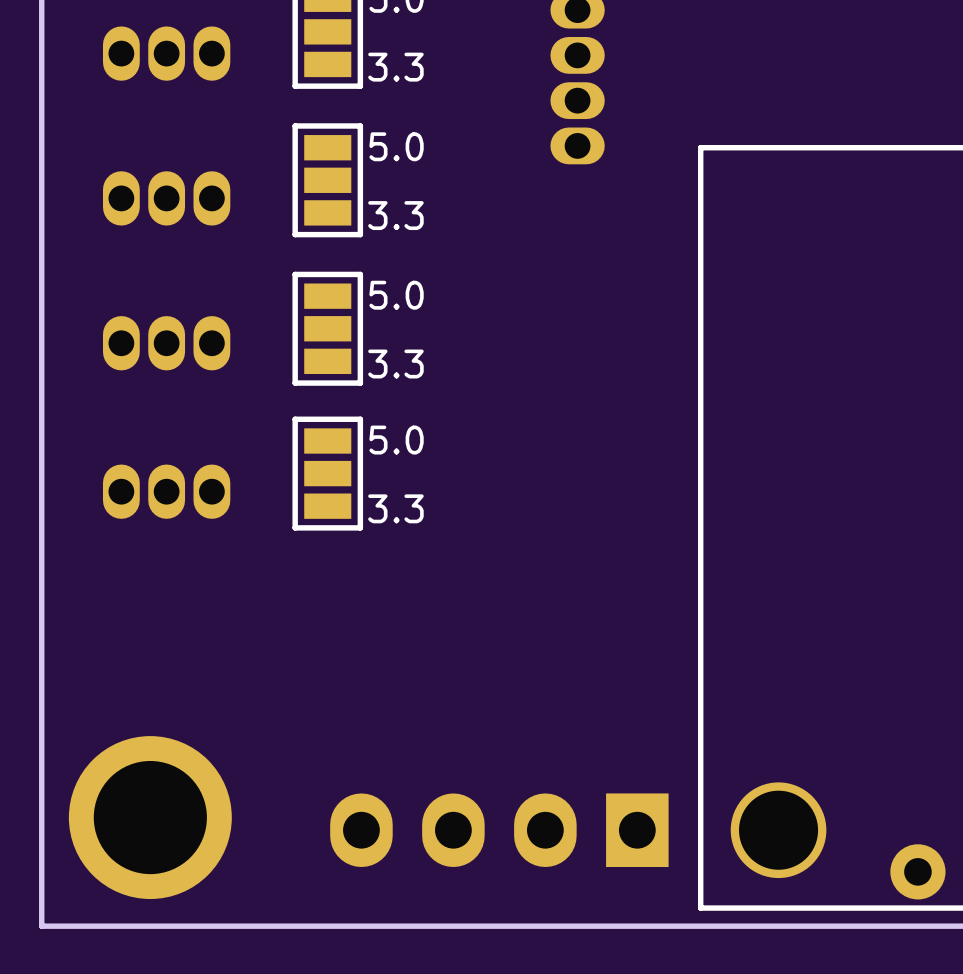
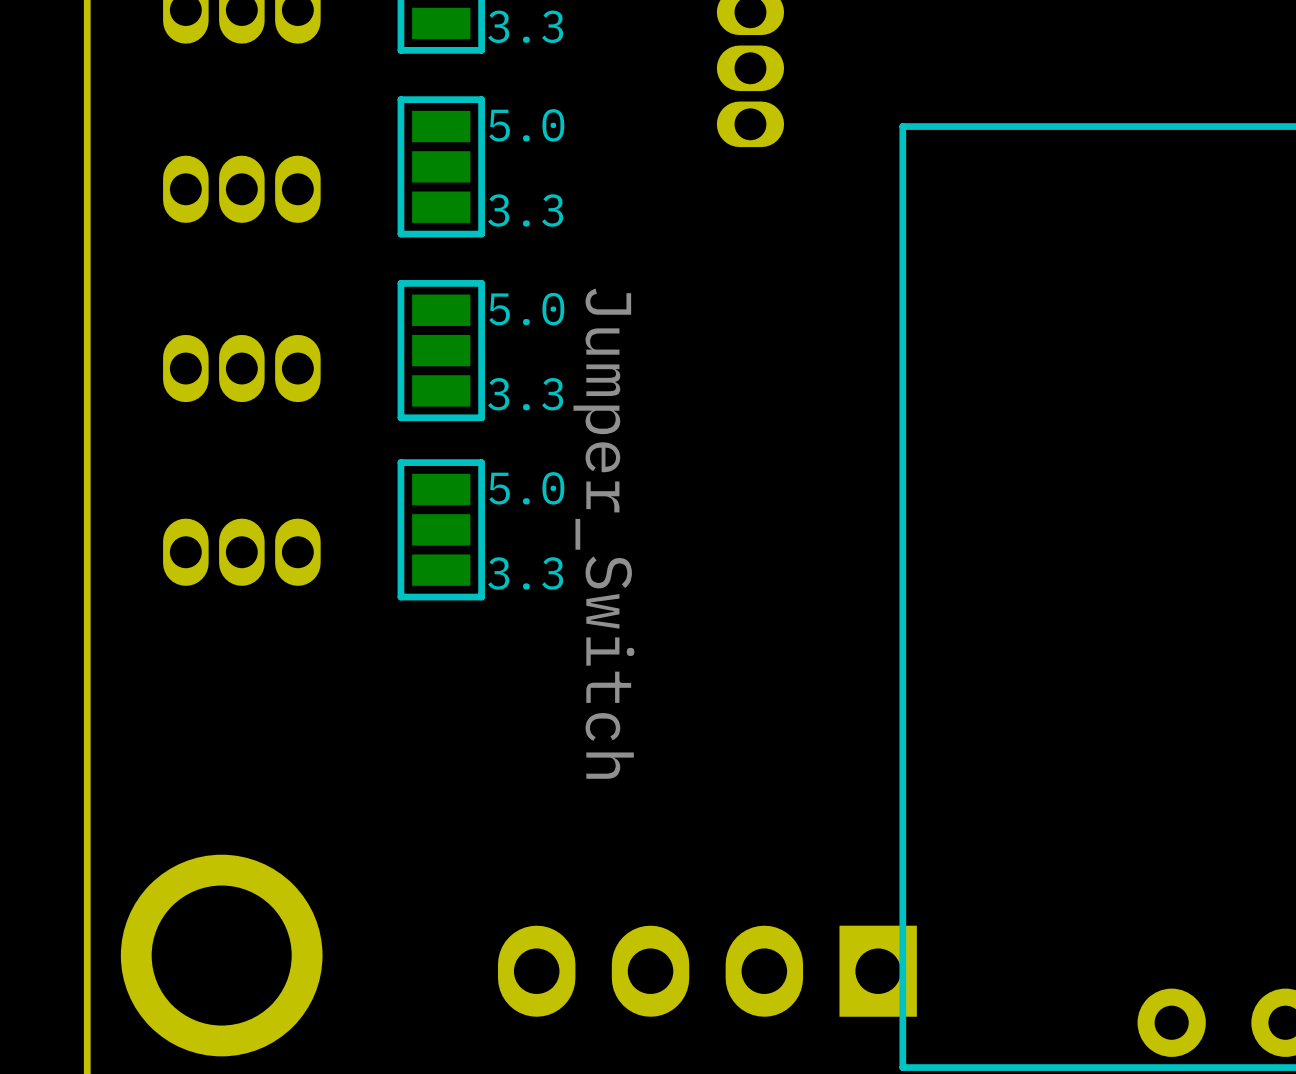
part value: none -> Jumper_Switch (603, 533)
part position: (499, 830) -> (707, 971)
part: (778, 830) -> none

